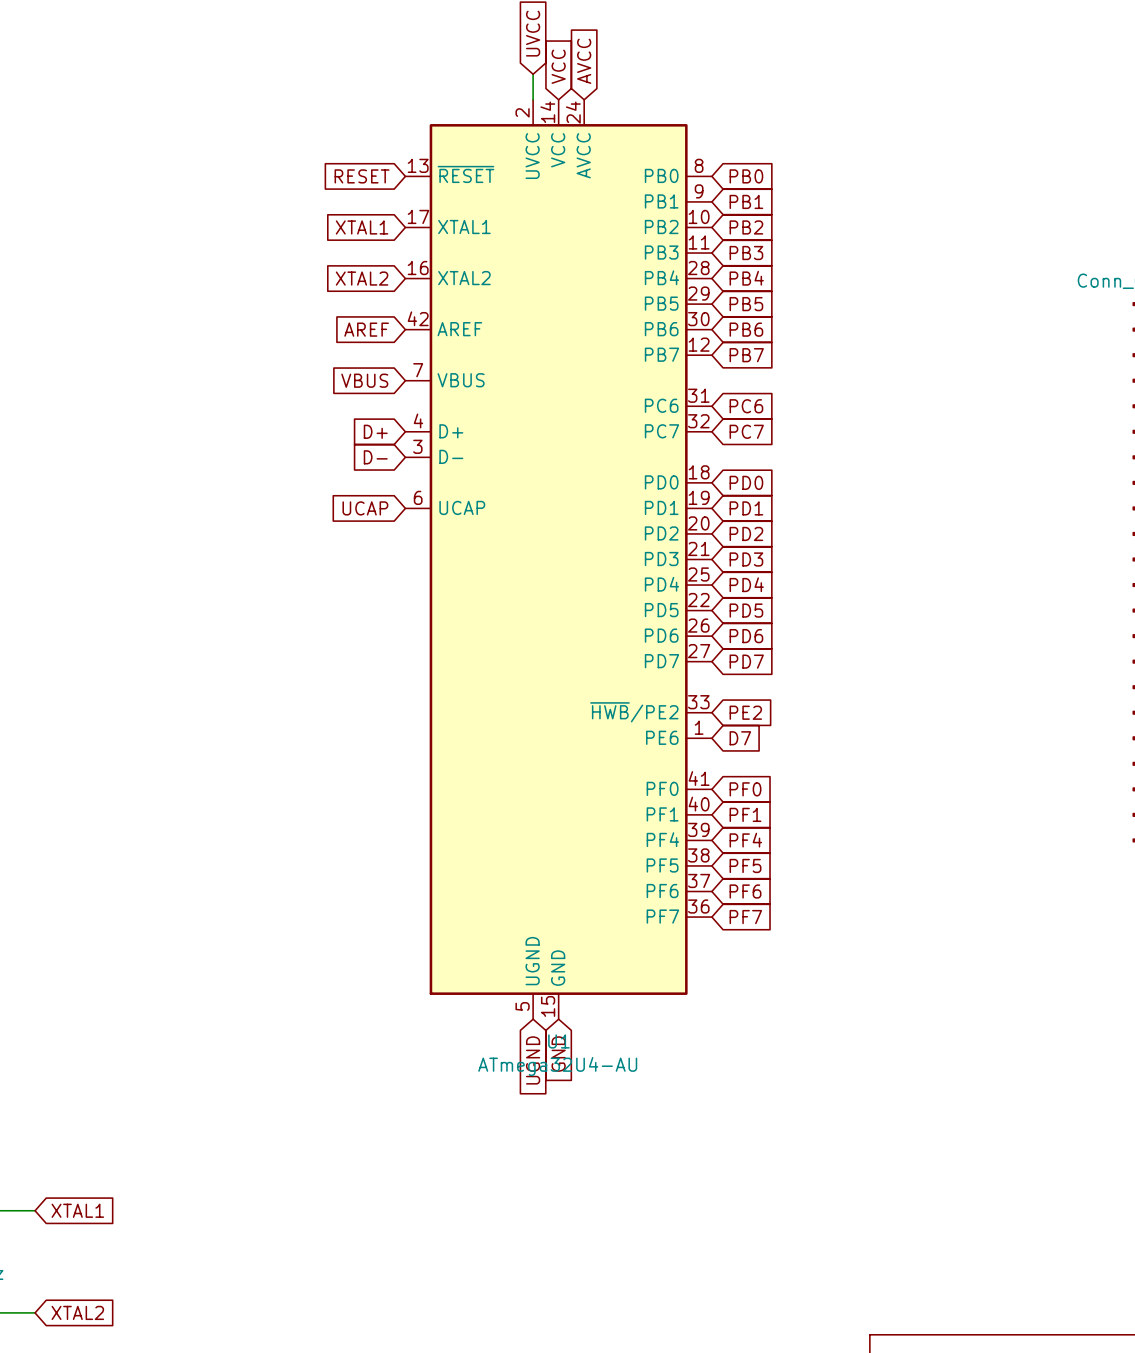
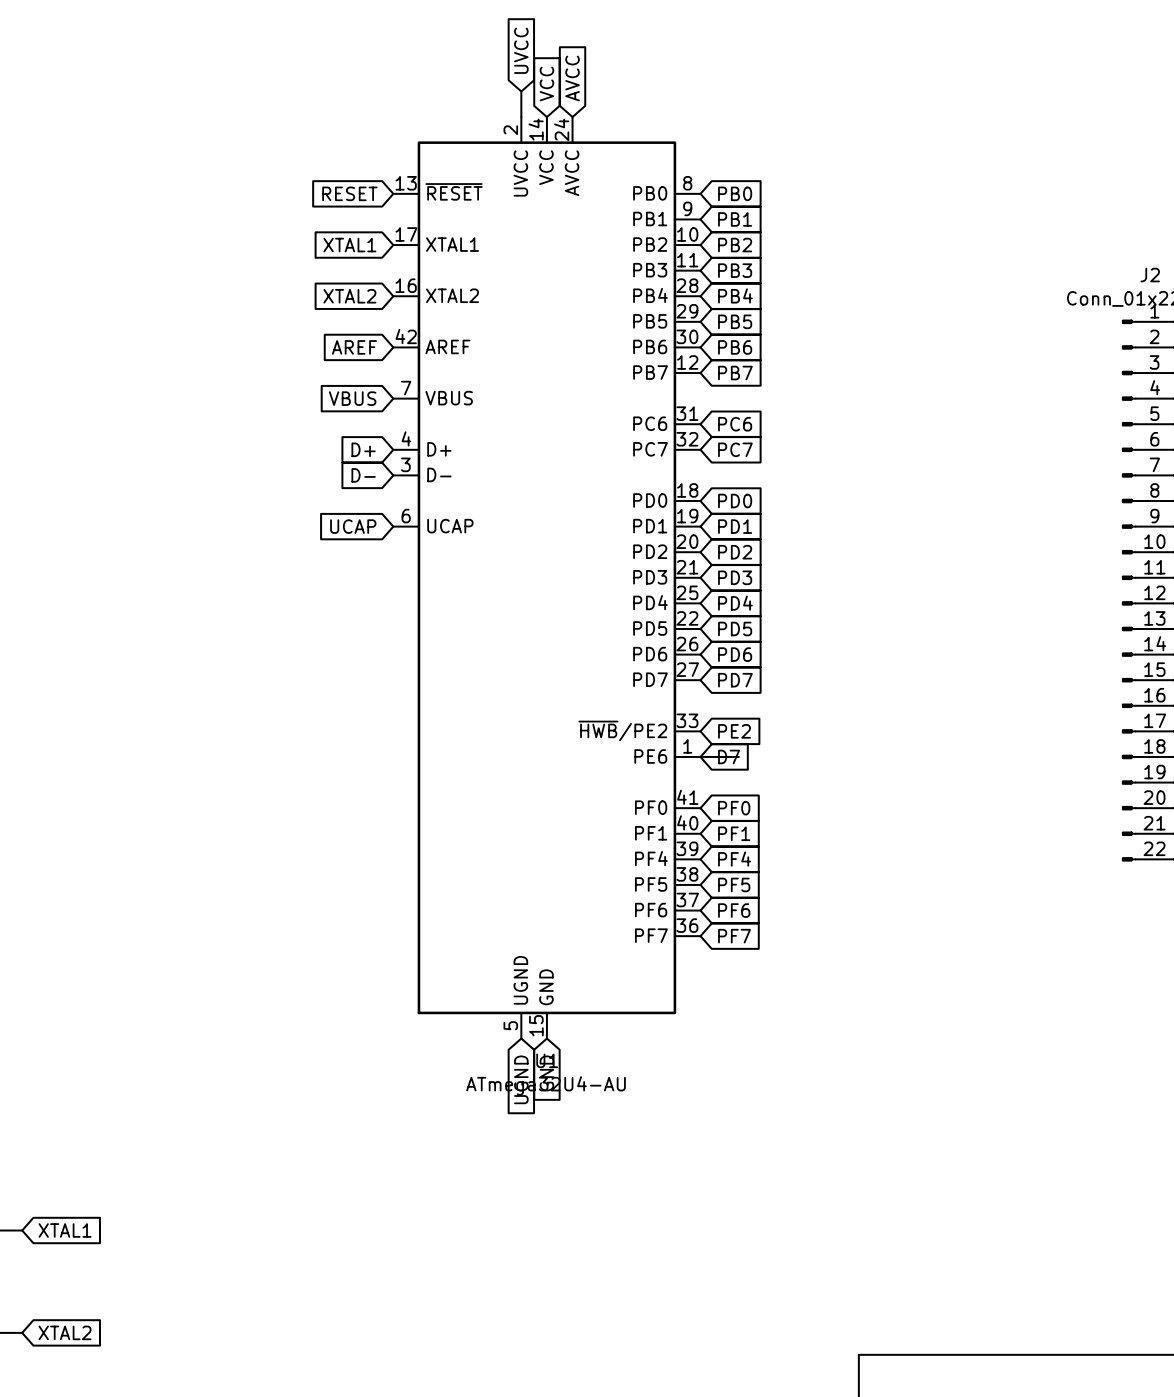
wire: none -> (700, 756) (738, 756)

